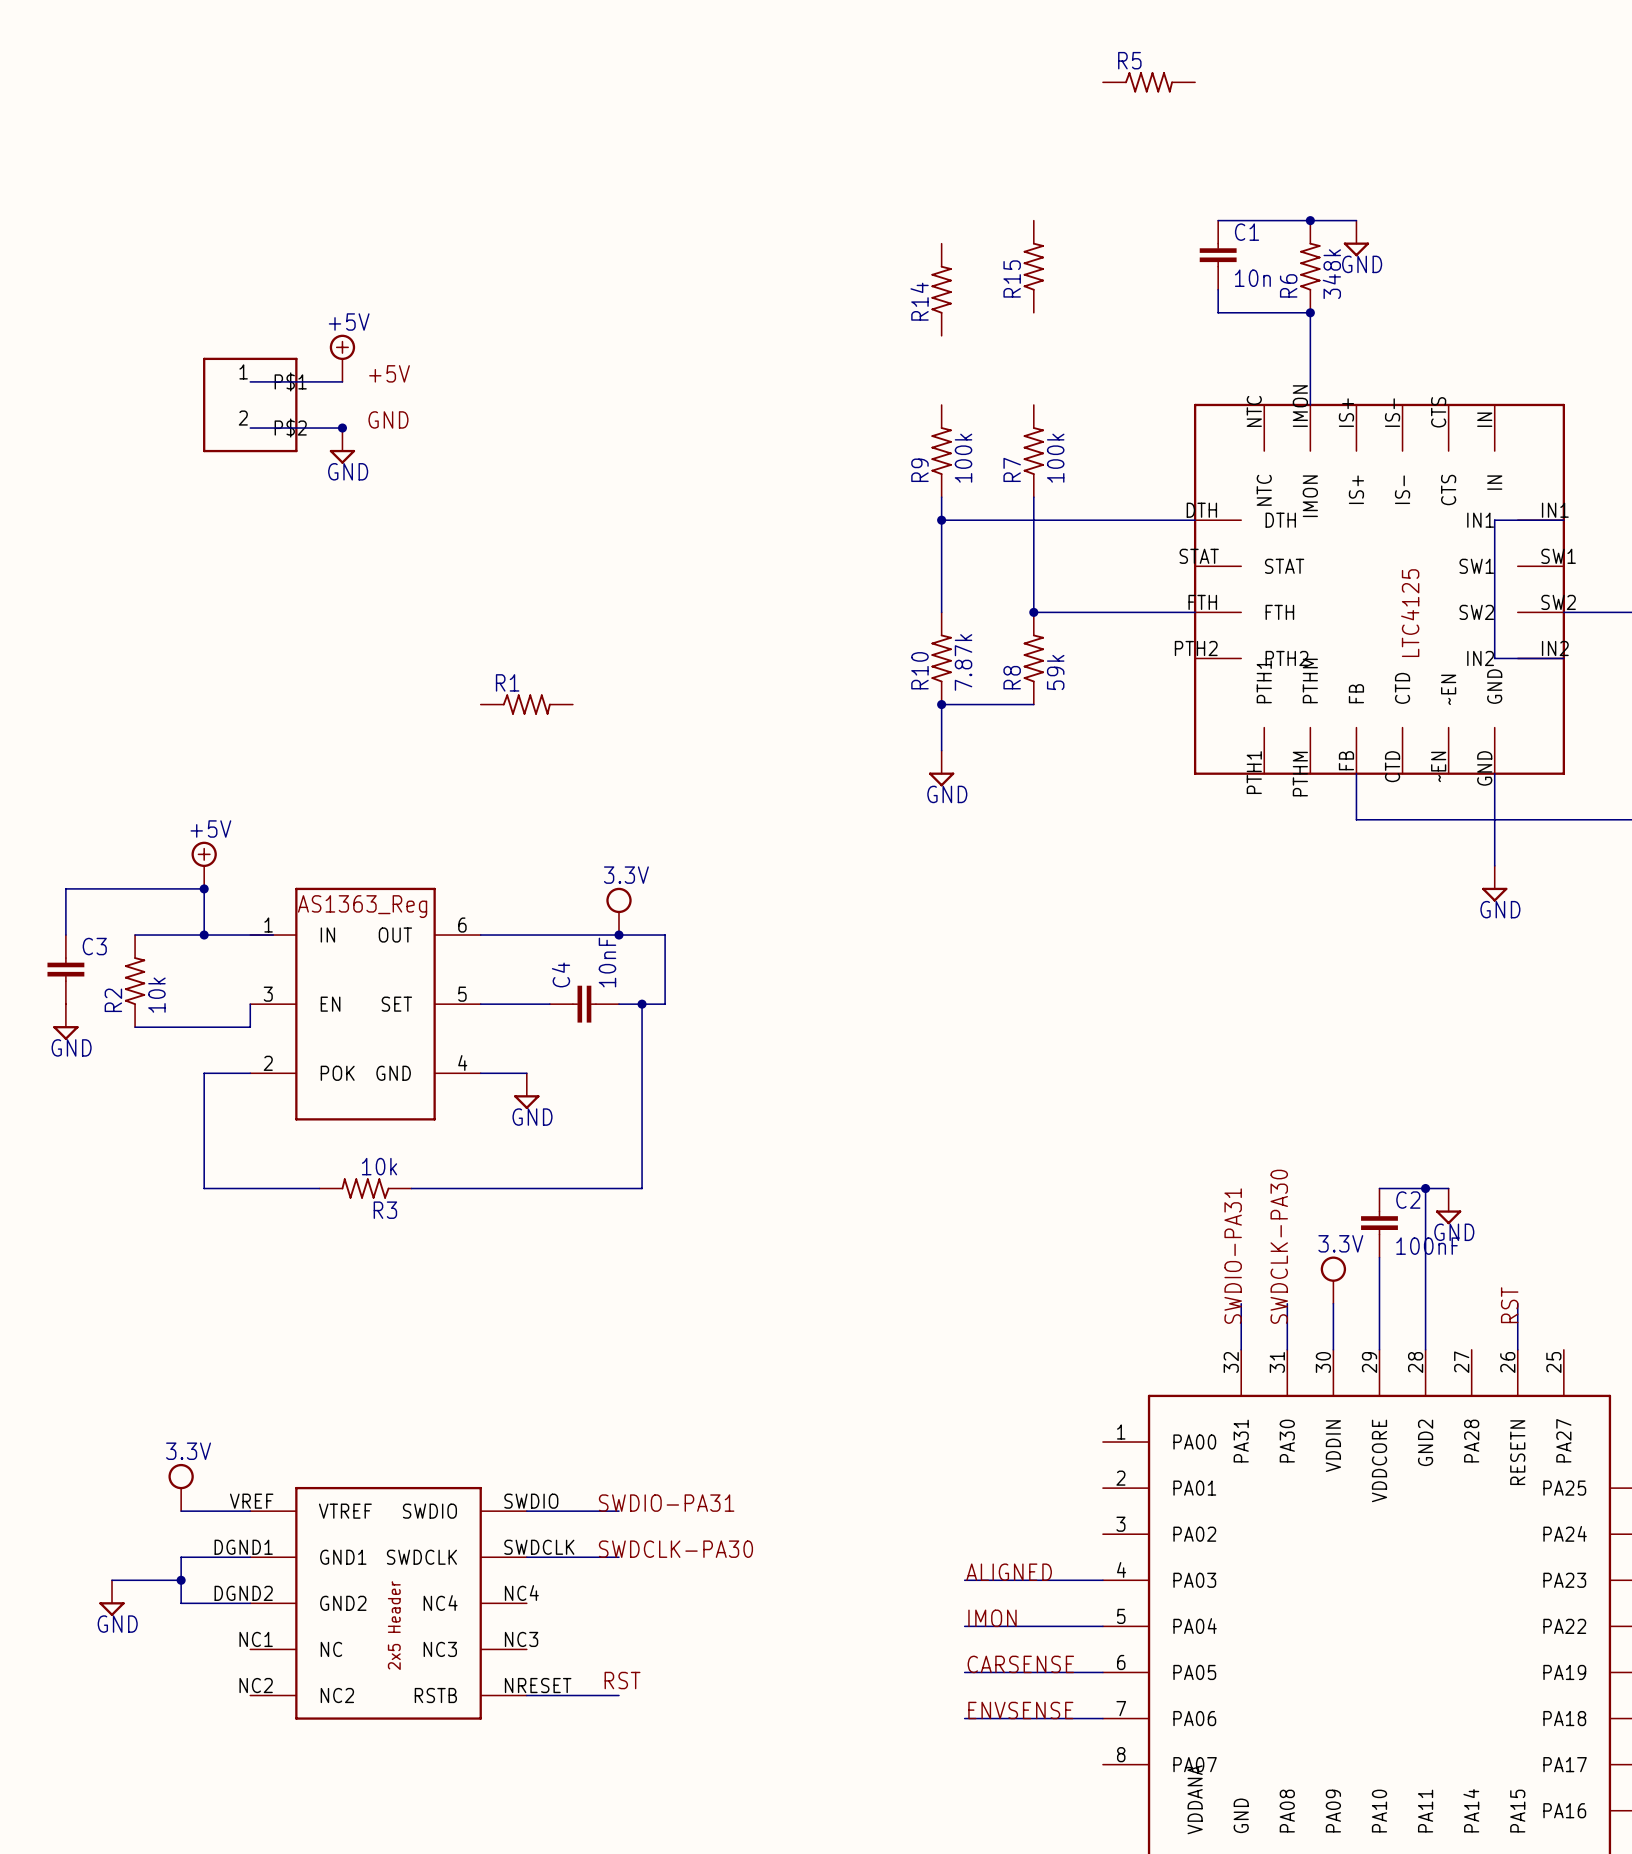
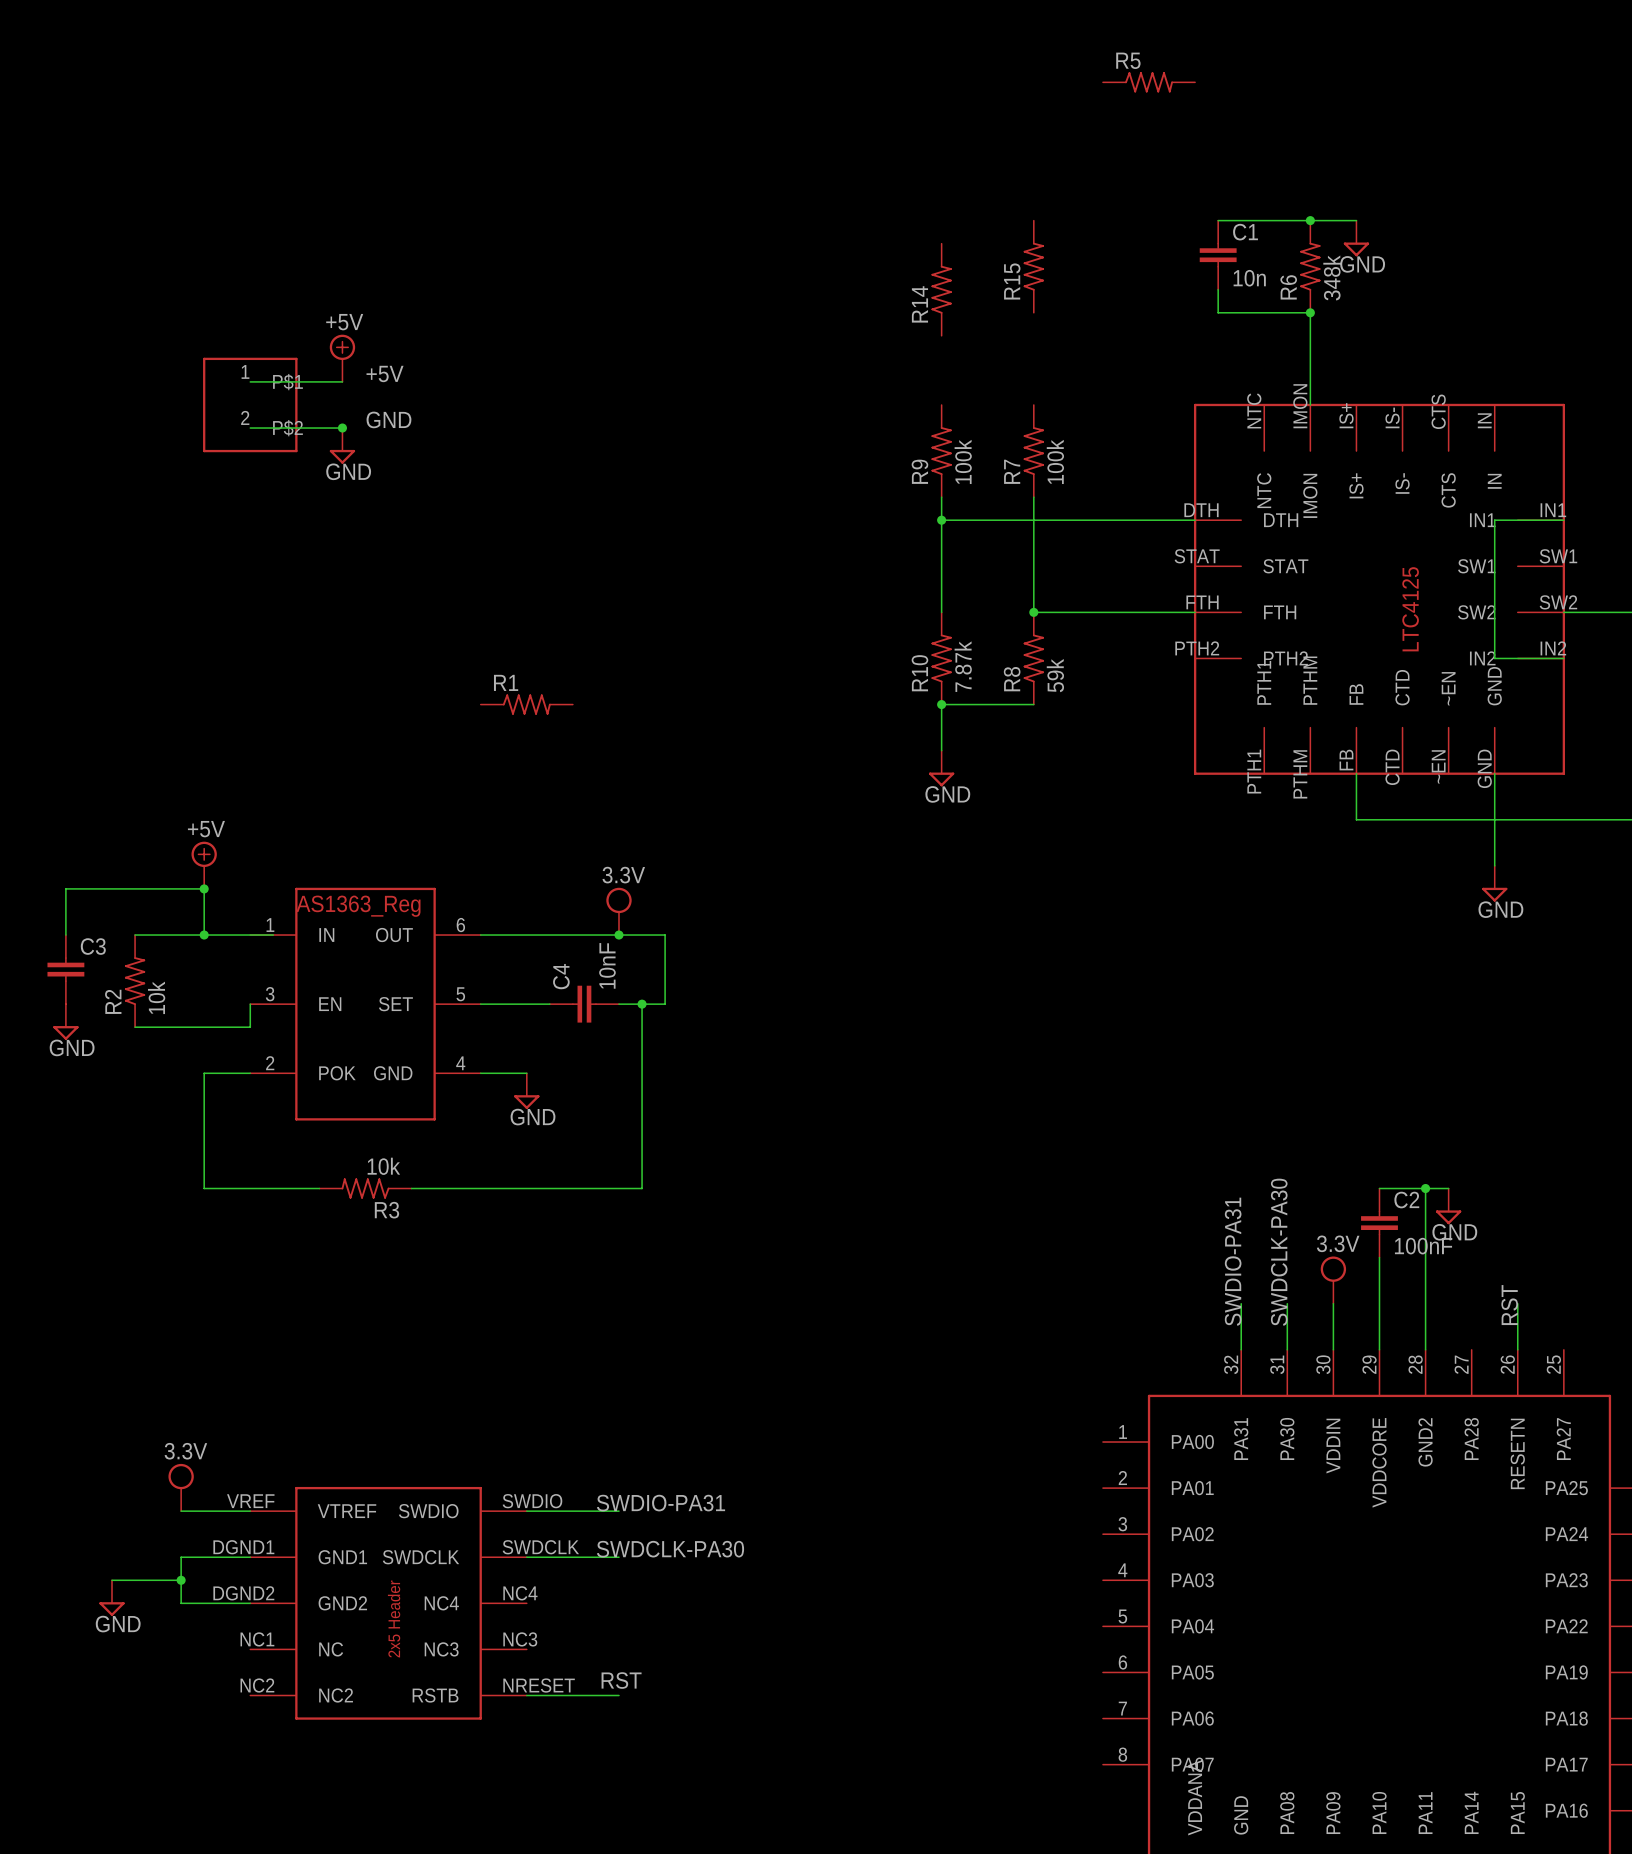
label: ALIGNED (1009, 1572) -> none
wire: (964, 1580) (1102, 1580) -> none
label: IMON (992, 1618) -> none
wire: (964, 1626) (1102, 1626) -> none
label: CARSENSE (1020, 1664) -> none
wire: (964, 1672) (1102, 1672) -> none
label: ENVSENSE (1020, 1710) -> none
wire: (964, 1718) (1102, 1718) -> none

